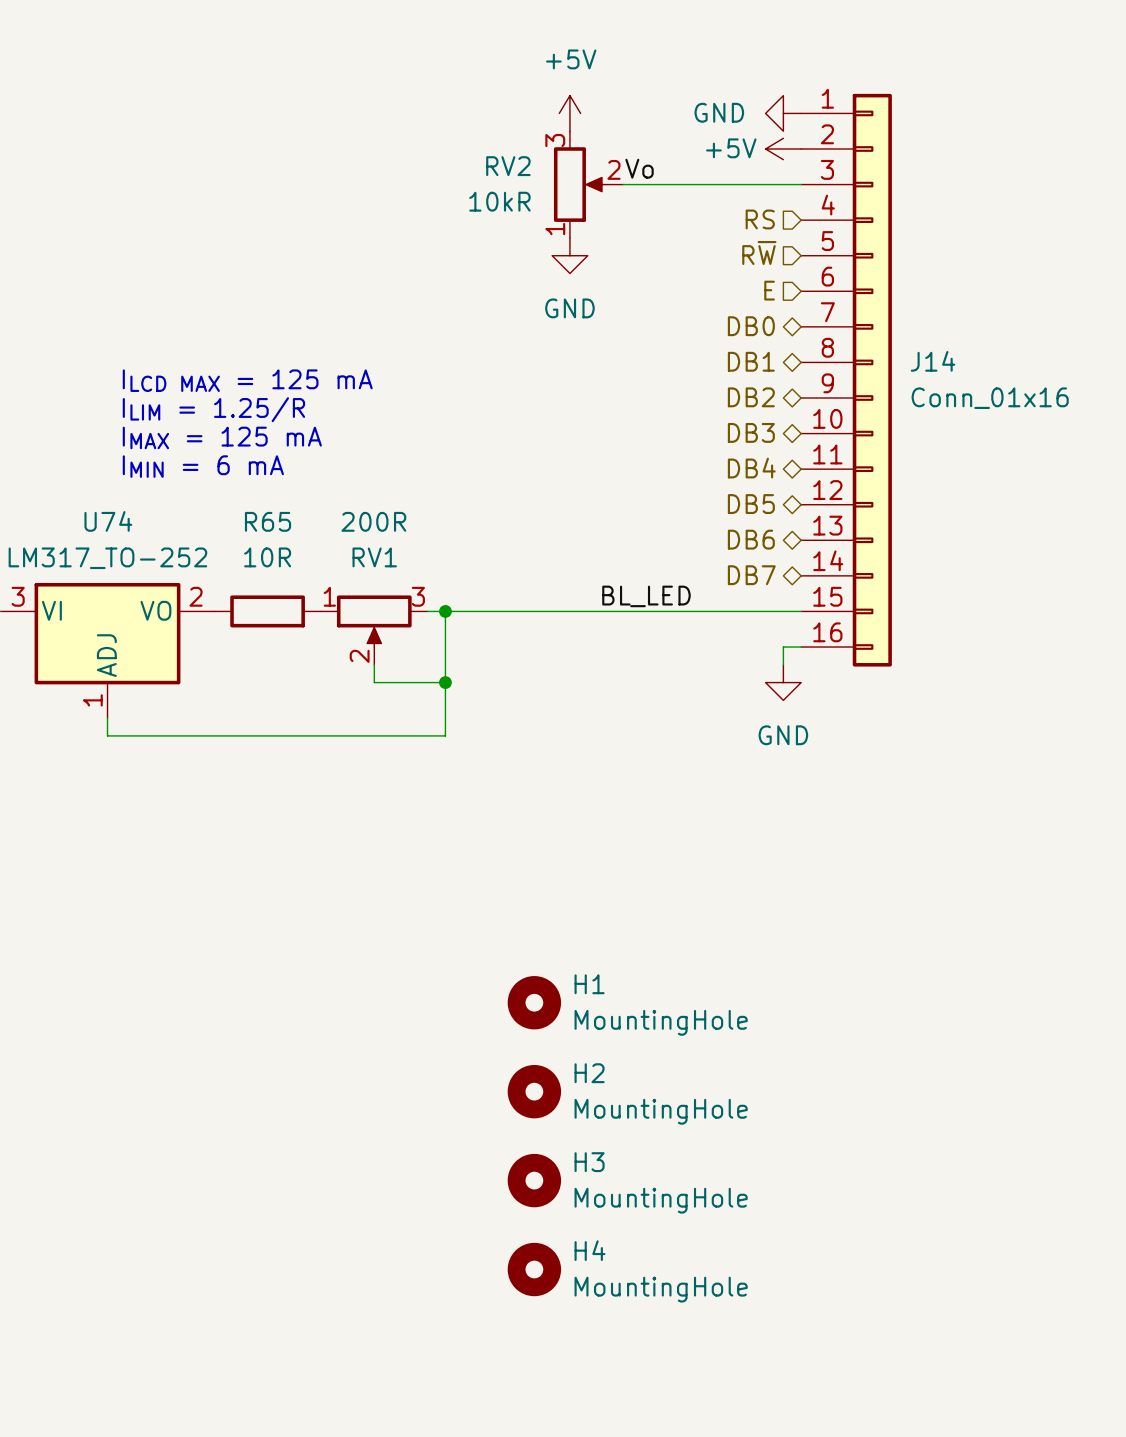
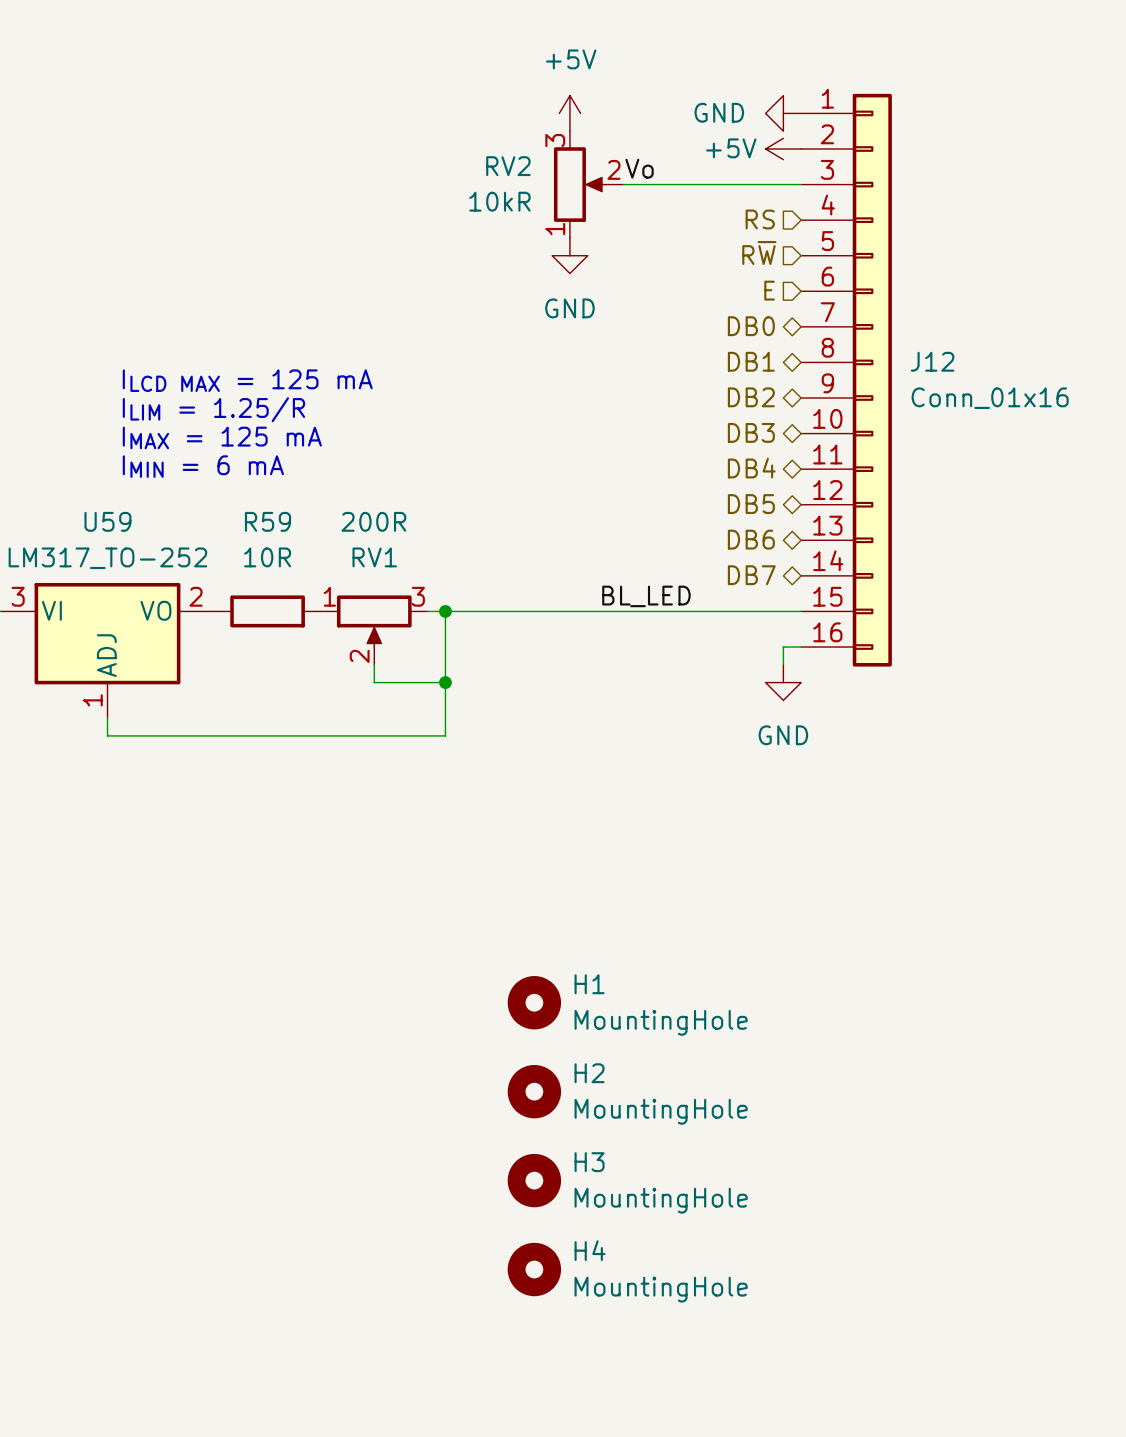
J14 name: J14 (933, 361) -> J12 (932, 361)
U74 name: U74 (108, 521) -> U59 (107, 521)
R65 name: R65 (268, 521) -> R59 (268, 521)

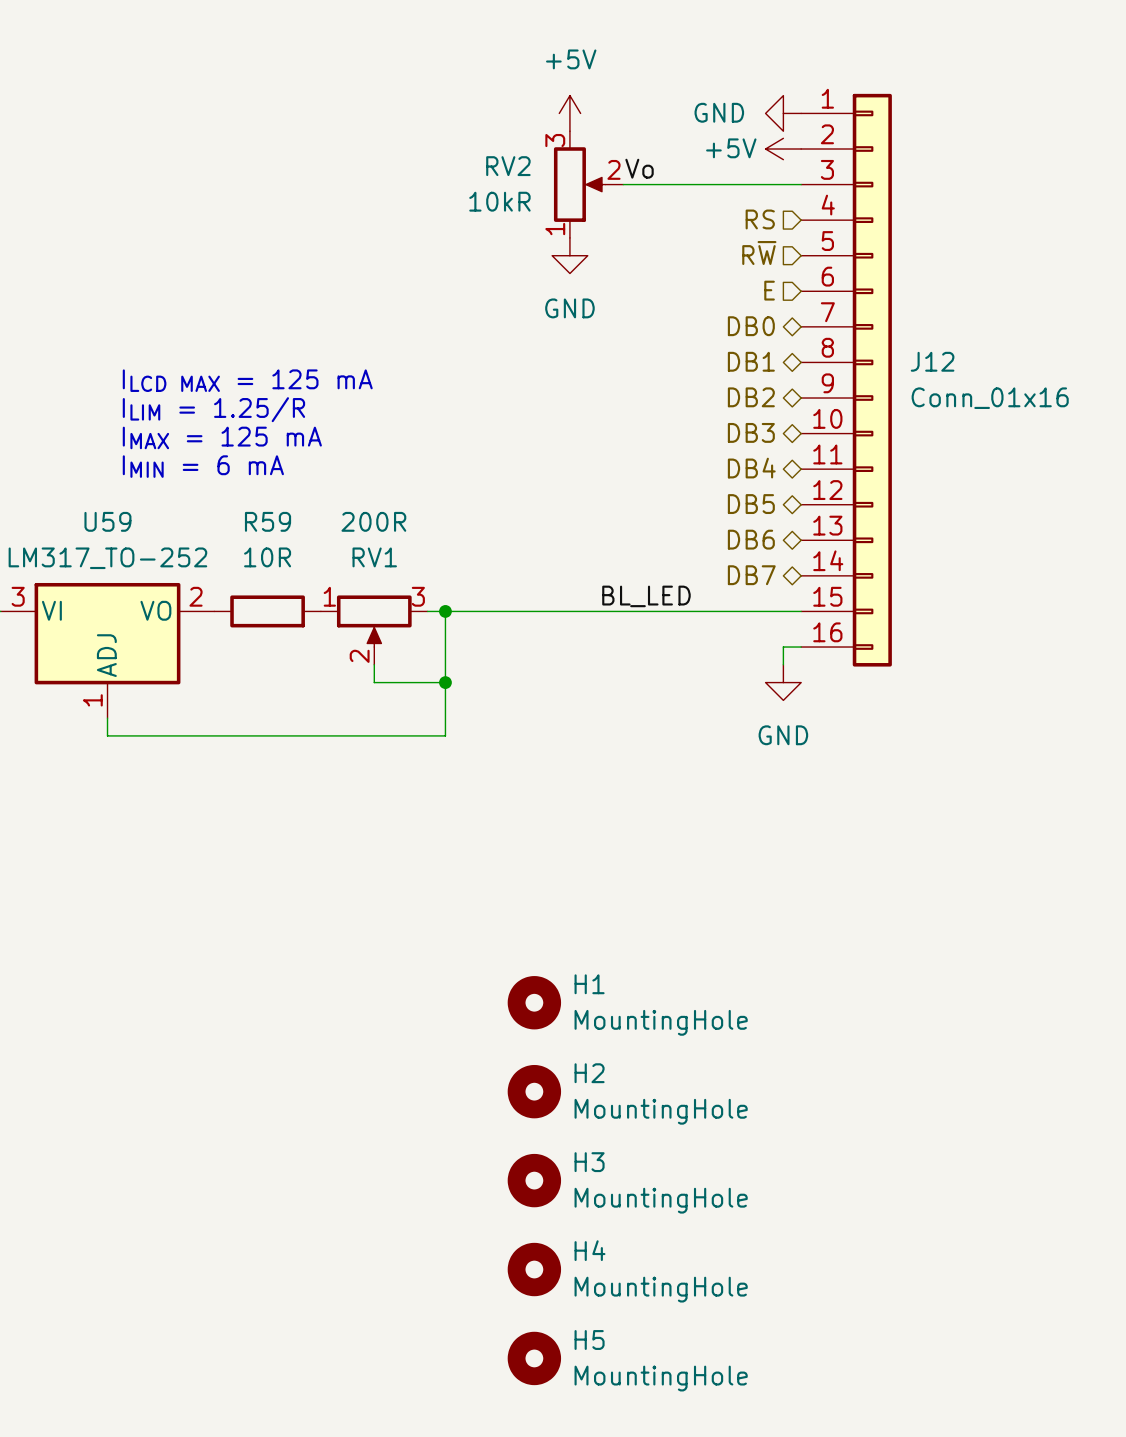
H5: none -> MountingHole (534, 1358)

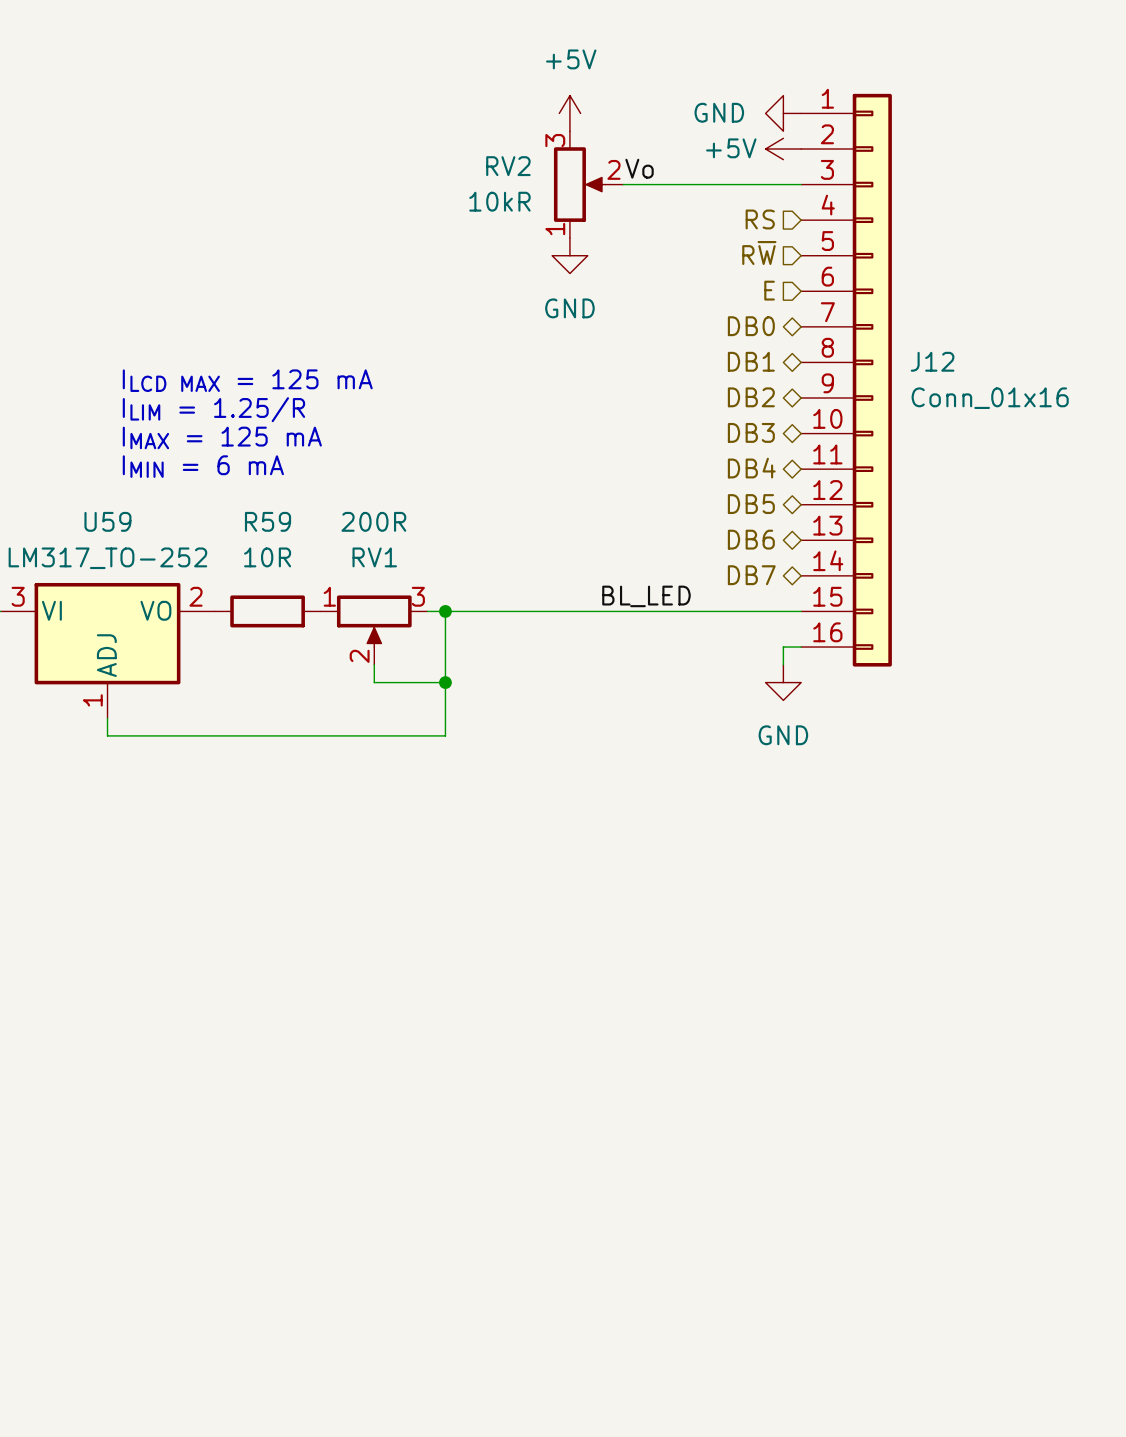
H1: MountingHole (534, 1002) -> none
H2: MountingHole (534, 1091) -> none
H3: MountingHole (534, 1180) -> none
H4: MountingHole (534, 1269) -> none
H5: MountingHole (534, 1358) -> none

